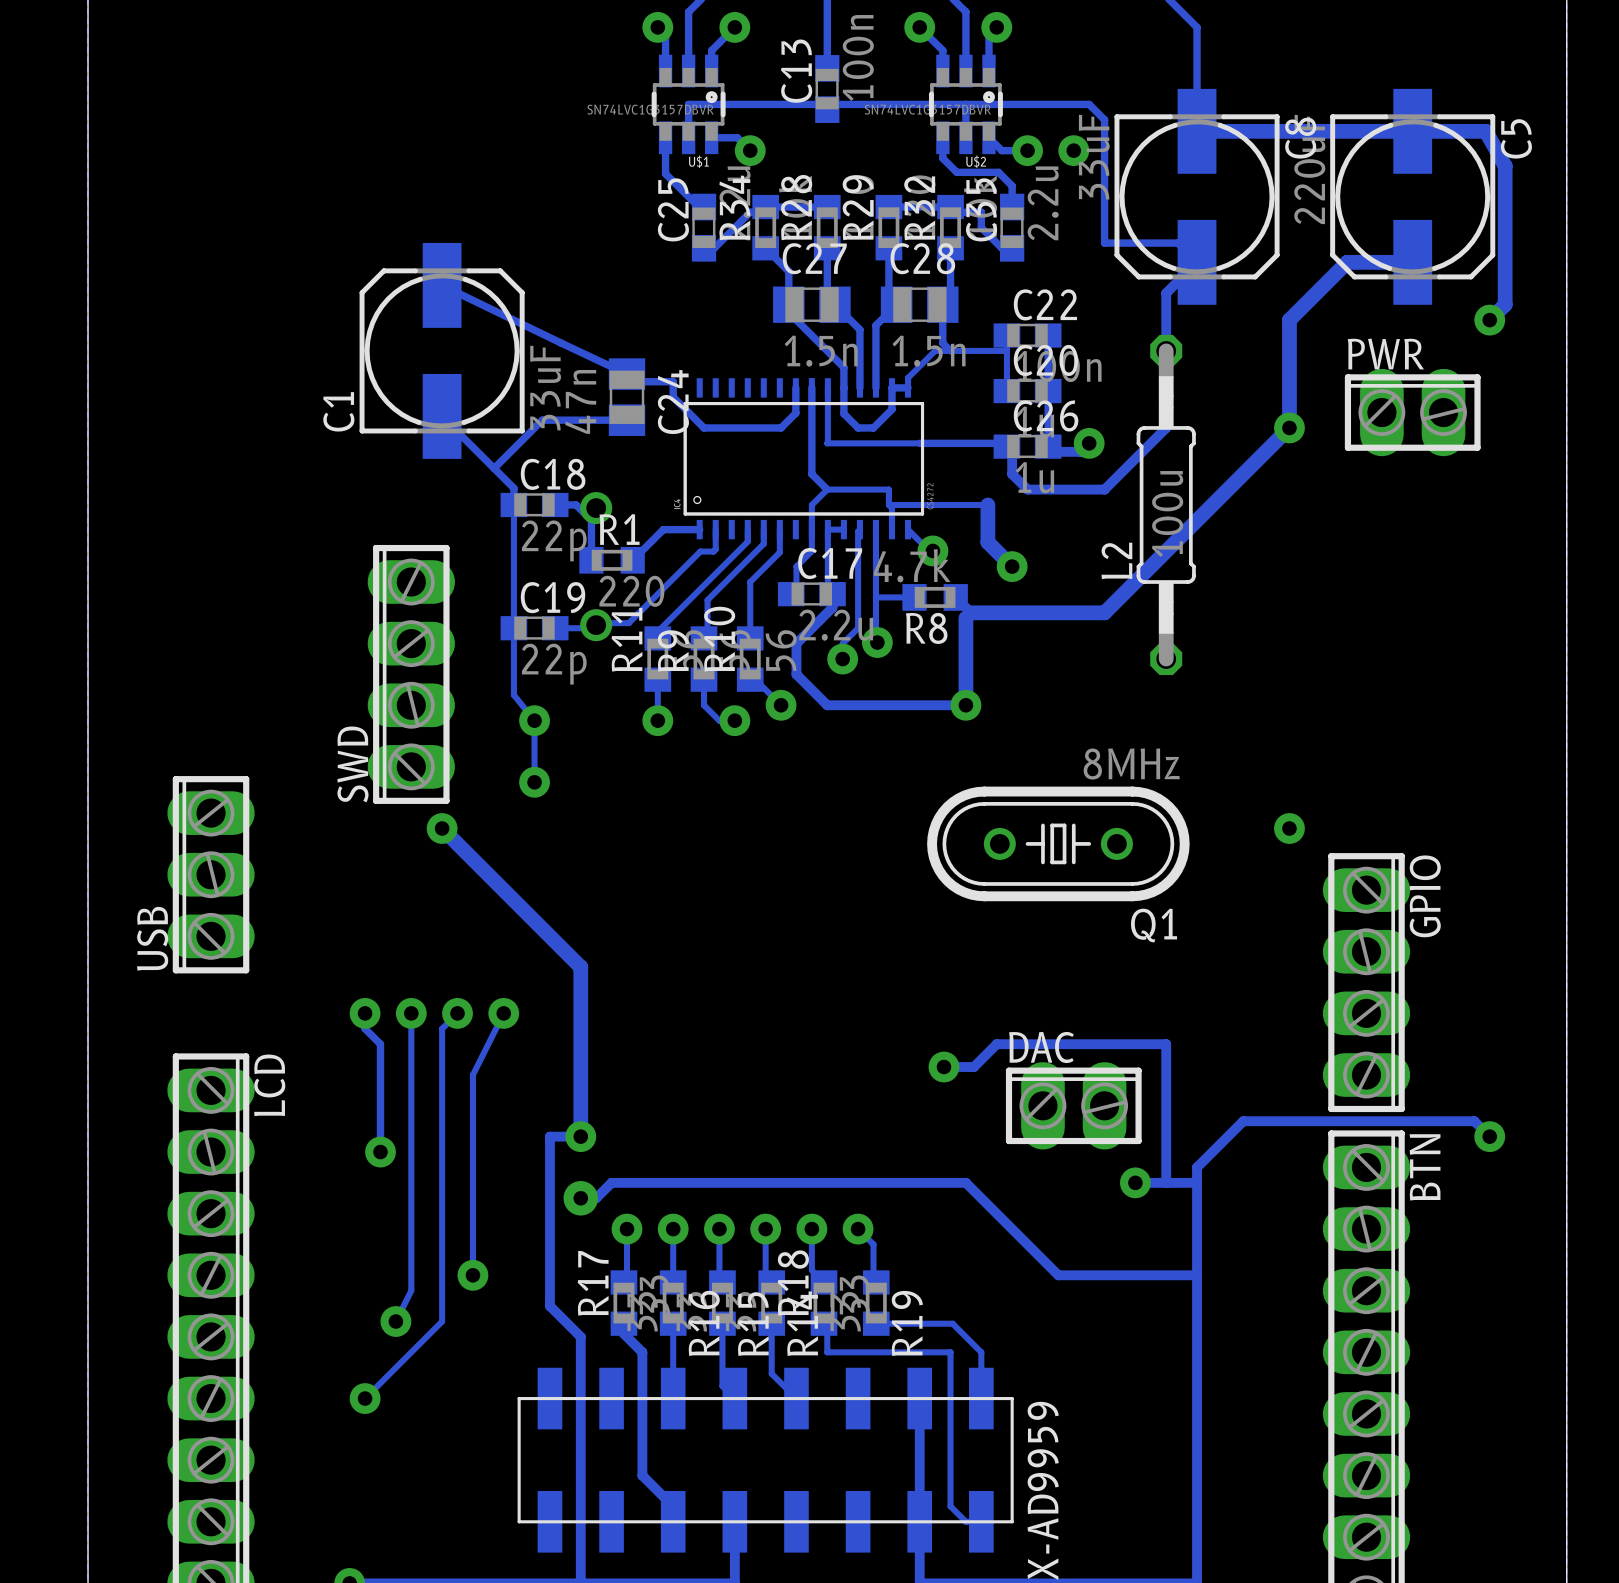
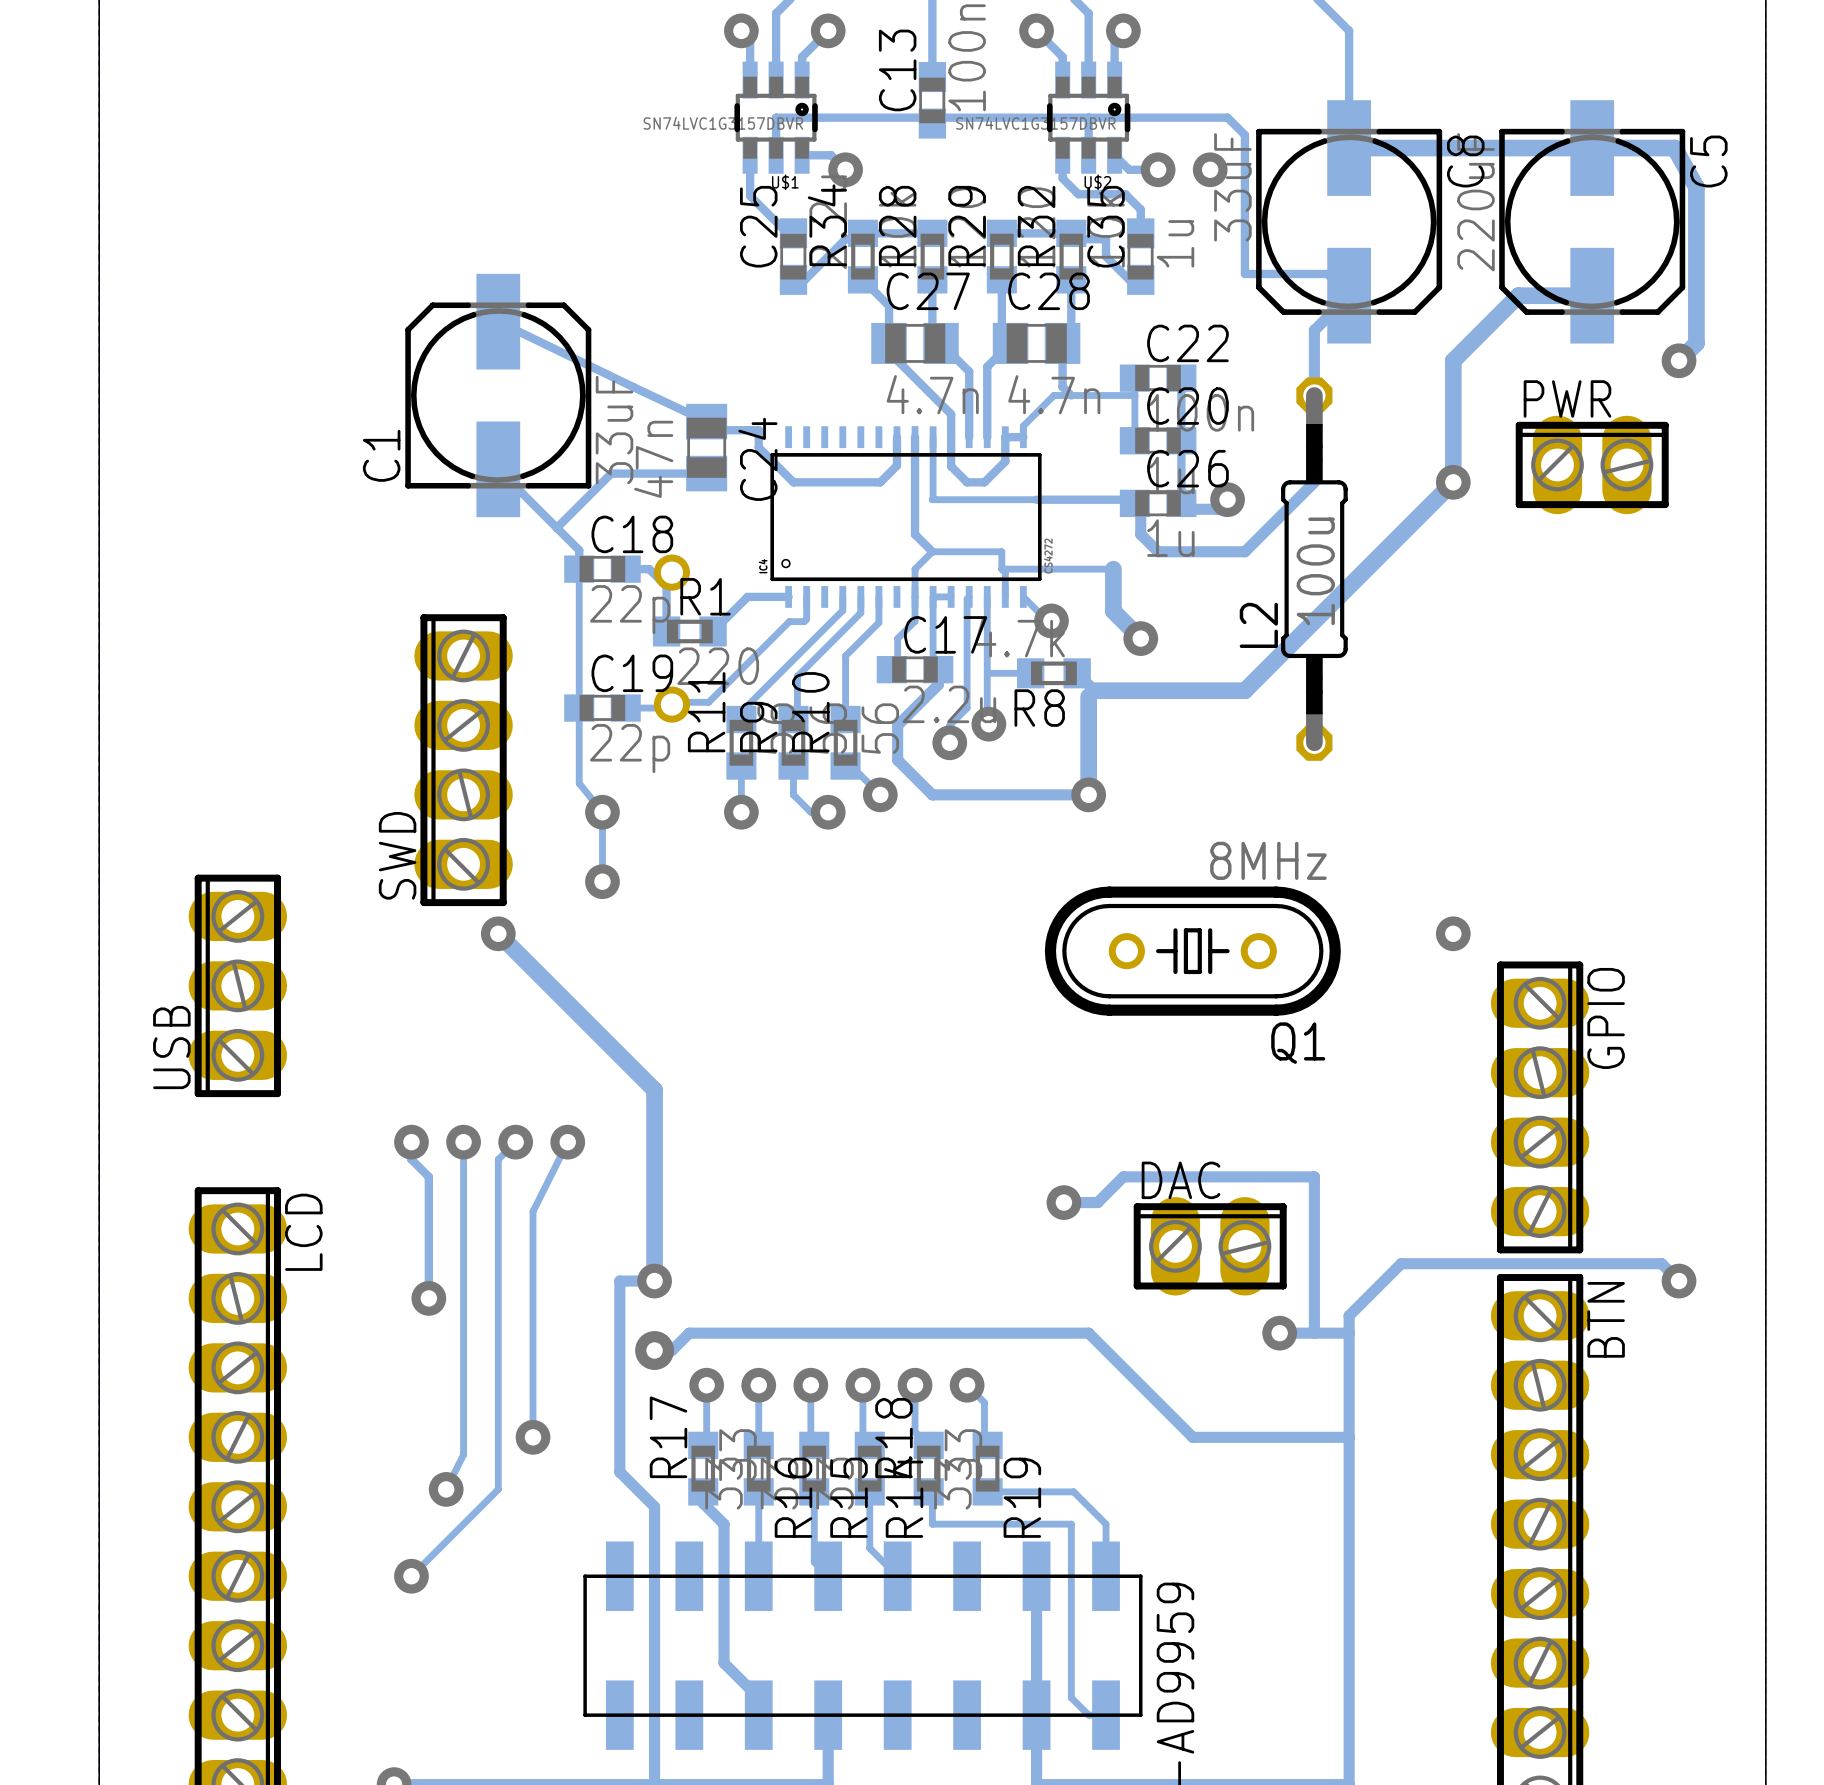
C35 value: 2.2u (1043, 203) -> 1u (1175, 243)
C27 value: 1.5n (821, 351) -> 4.7n (932, 394)
C28 value: 1.5n (929, 351) -> 4.7n (1054, 394)

